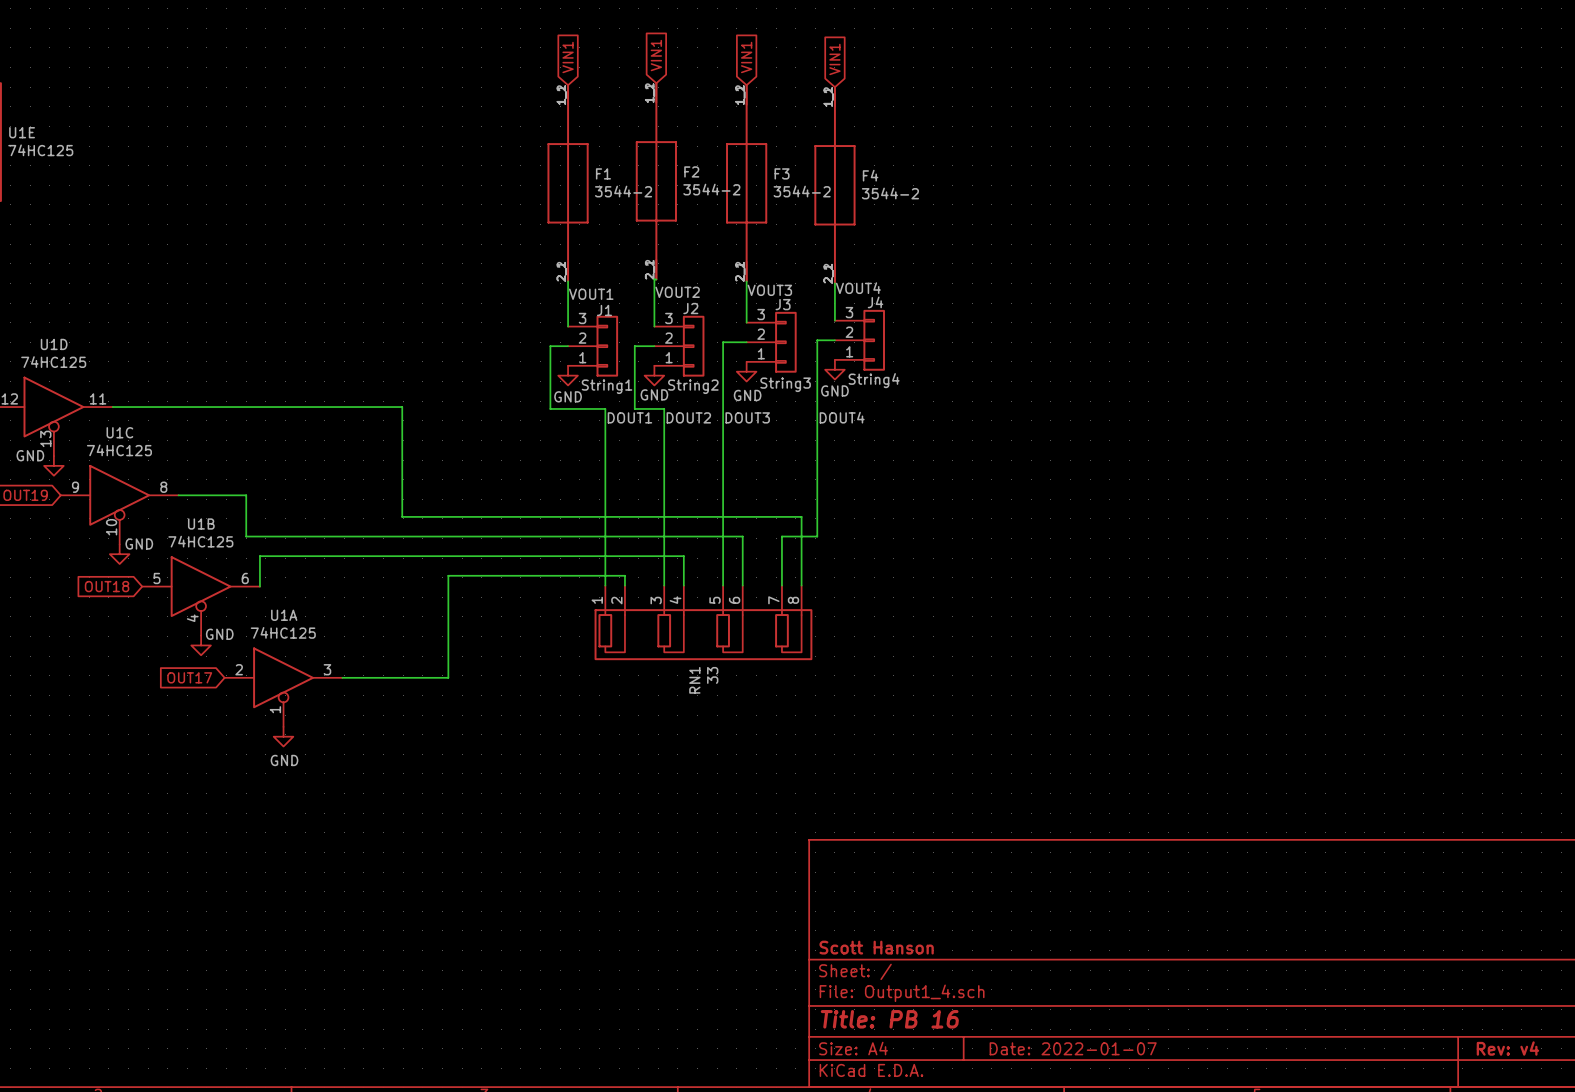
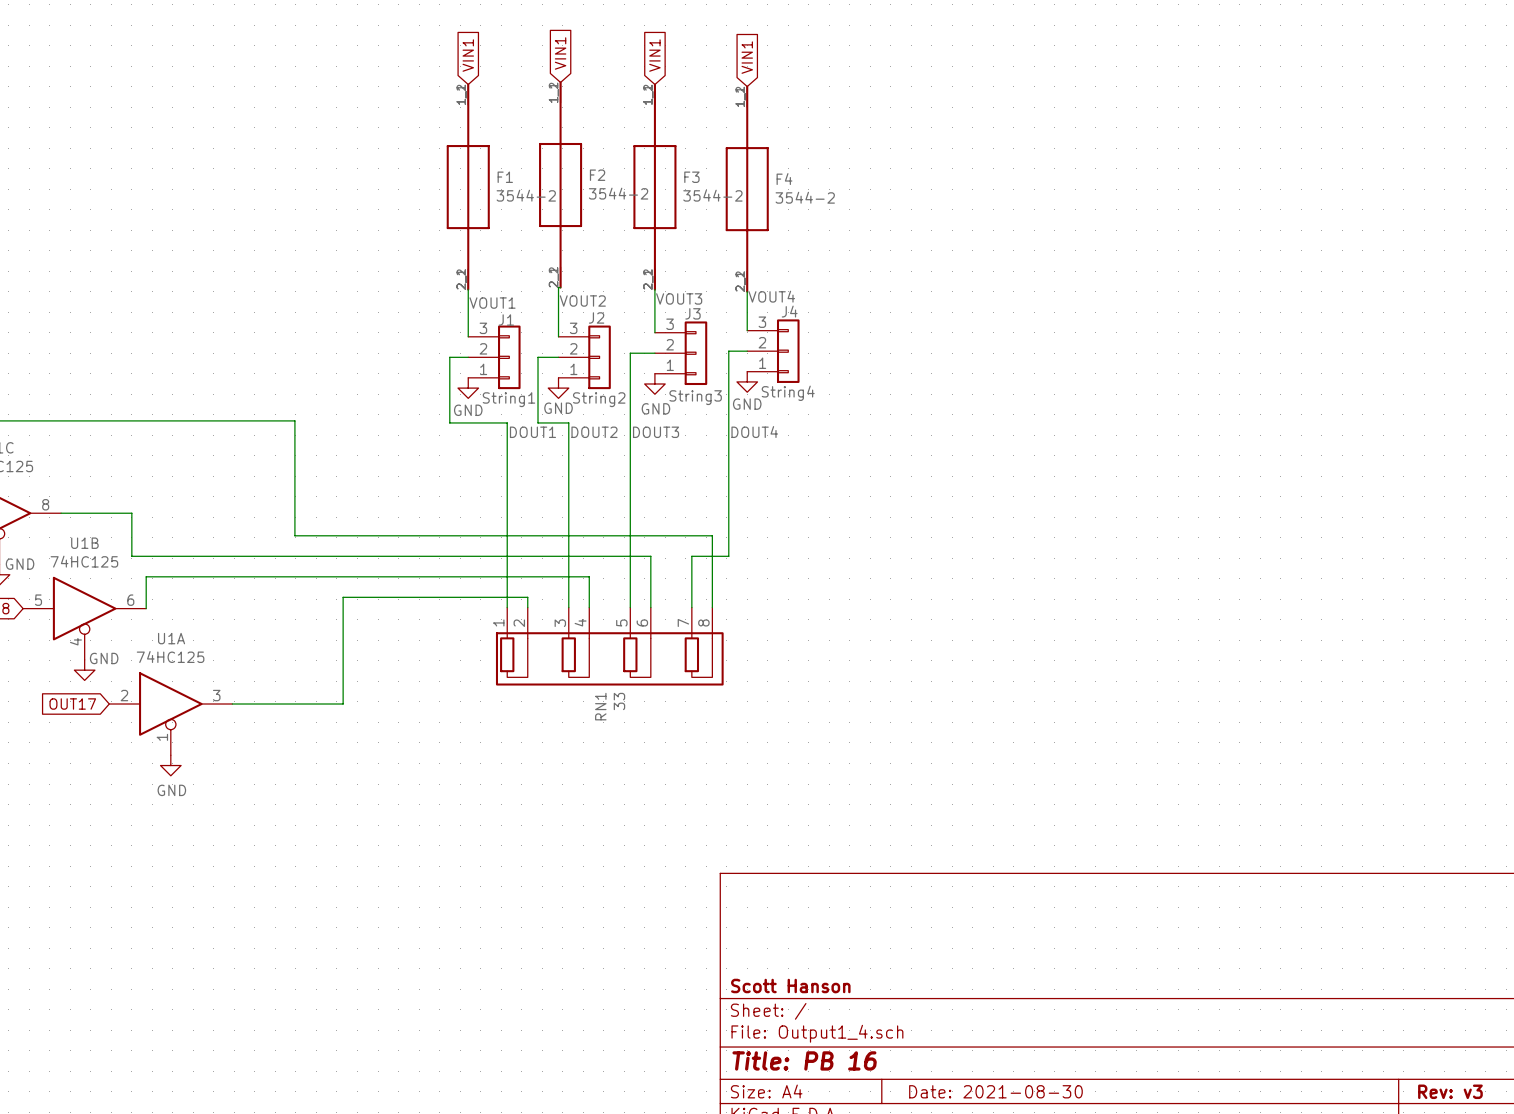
title block: Date: 2022-01-07 (1073, 1048) -> Date: 2021-08-30 (995, 1091)
title block: Rev: v4 (1507, 1048) -> Rev: v3 (1450, 1091)

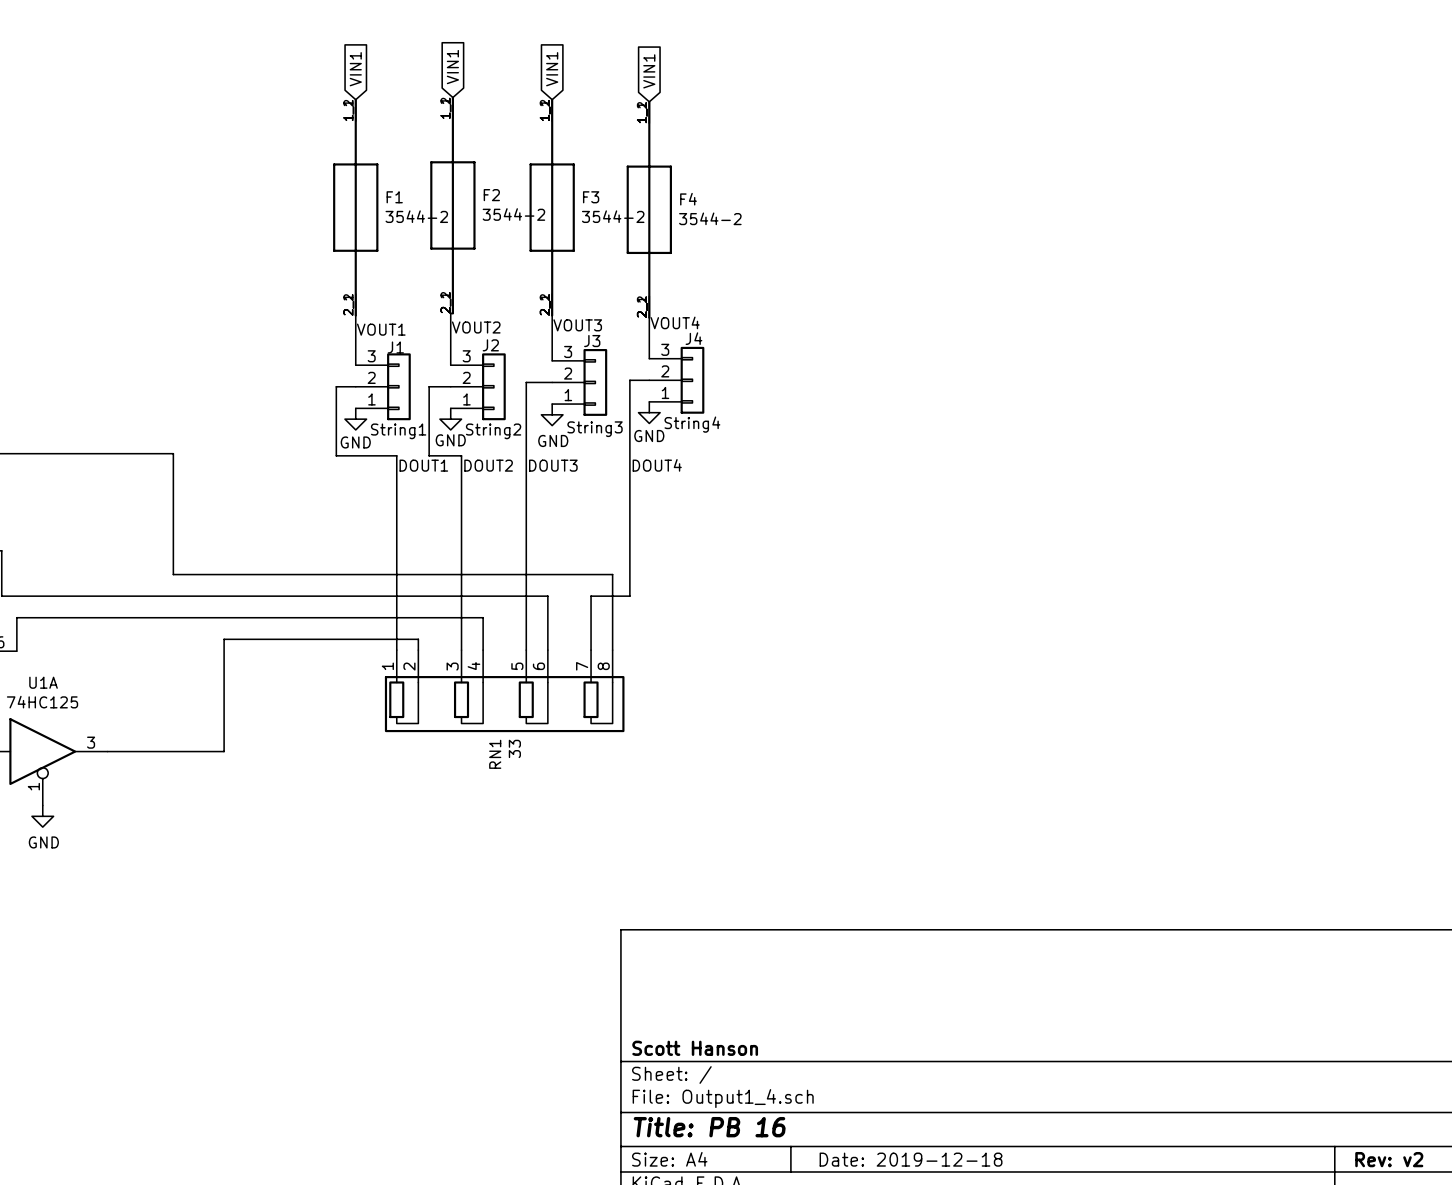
title block: Date: 2021-08-30 (995, 1091) -> Date: 2019-12-18 (911, 1159)
title block: Rev: v3 (1450, 1091) -> Rev: v2 (1389, 1159)

